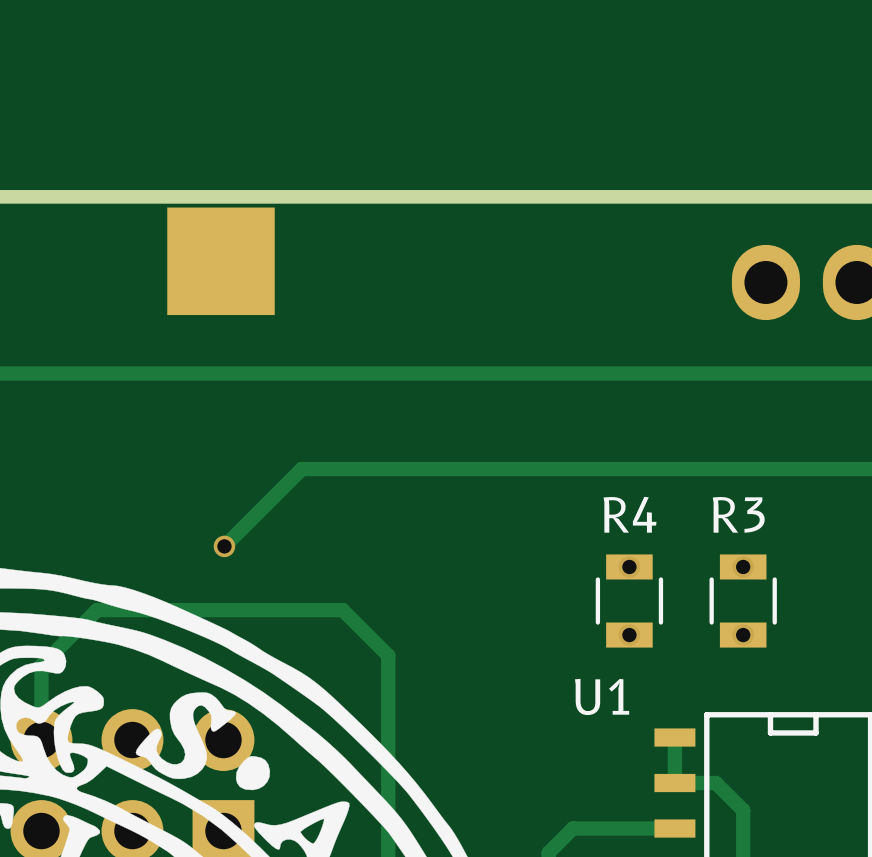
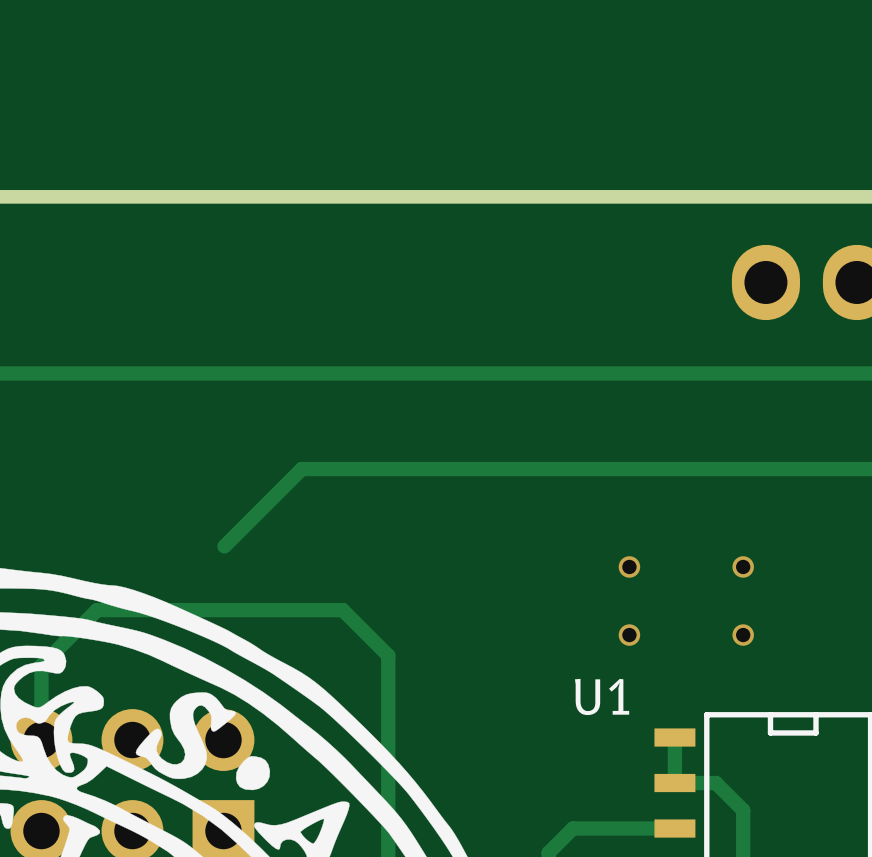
part: (221, 261) -> none
via: (224, 546) -> none
R4: (629, 601) -> none
R3: (743, 601) -> none

